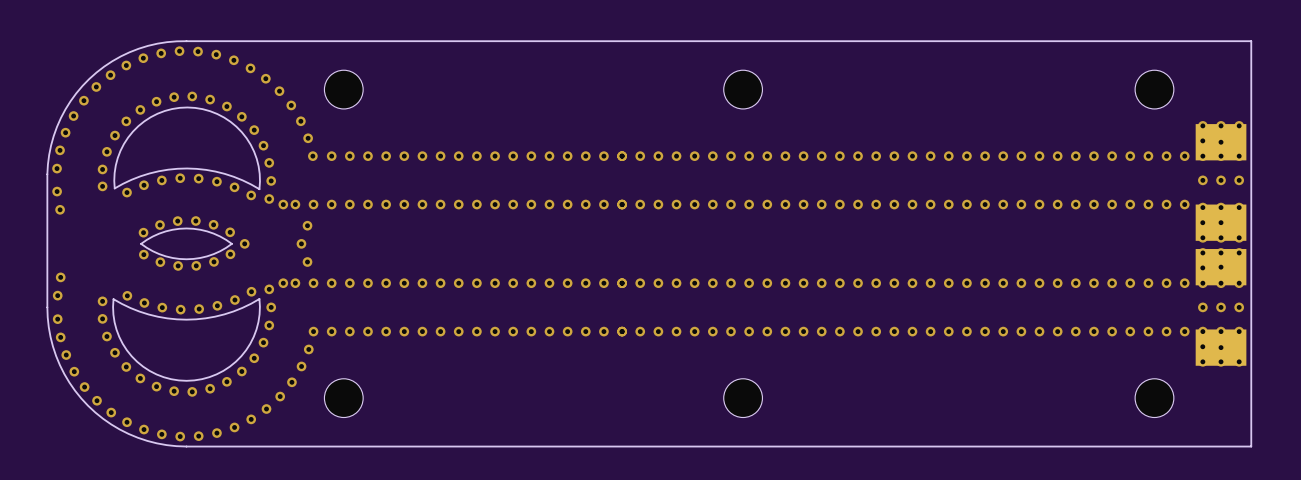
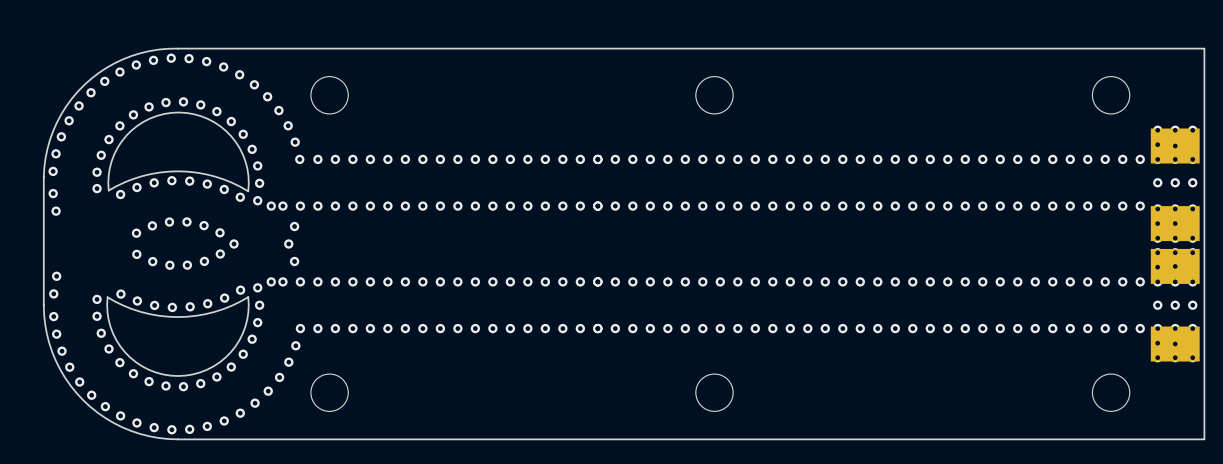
board edge: (231, 243) (207, 256) (186, 259) (165, 256) (141, 243) (159, 233) (186, 228) (207, 231) (231, 243) -> none

